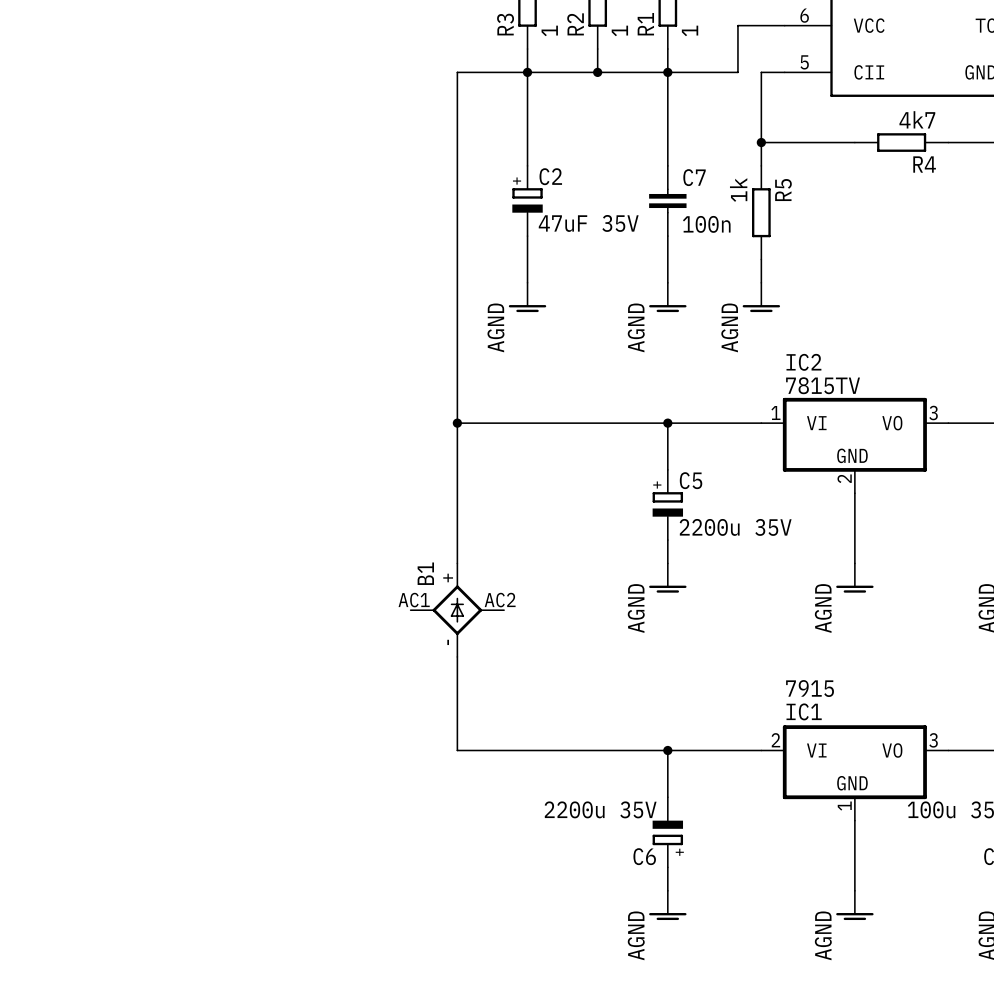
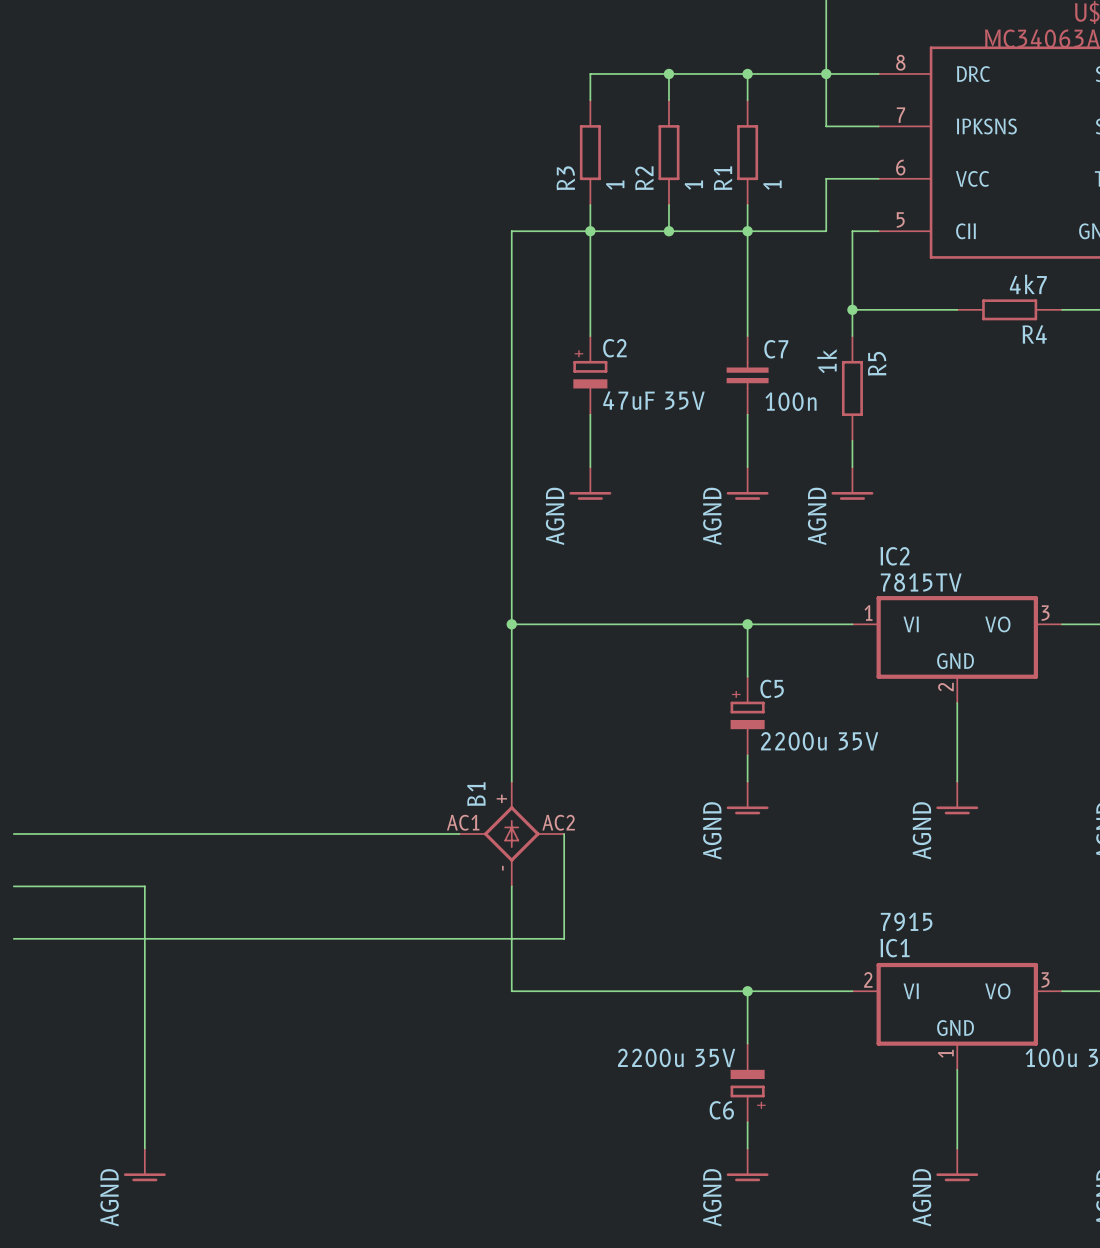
wire: none -> (13, 833) (459, 833)
wire: none -> (564, 833) (564, 938) (13, 938)
wire: none -> (13, 886) (144, 886) (144, 1148)
power symbol: none -> AGND (144, 1164)

